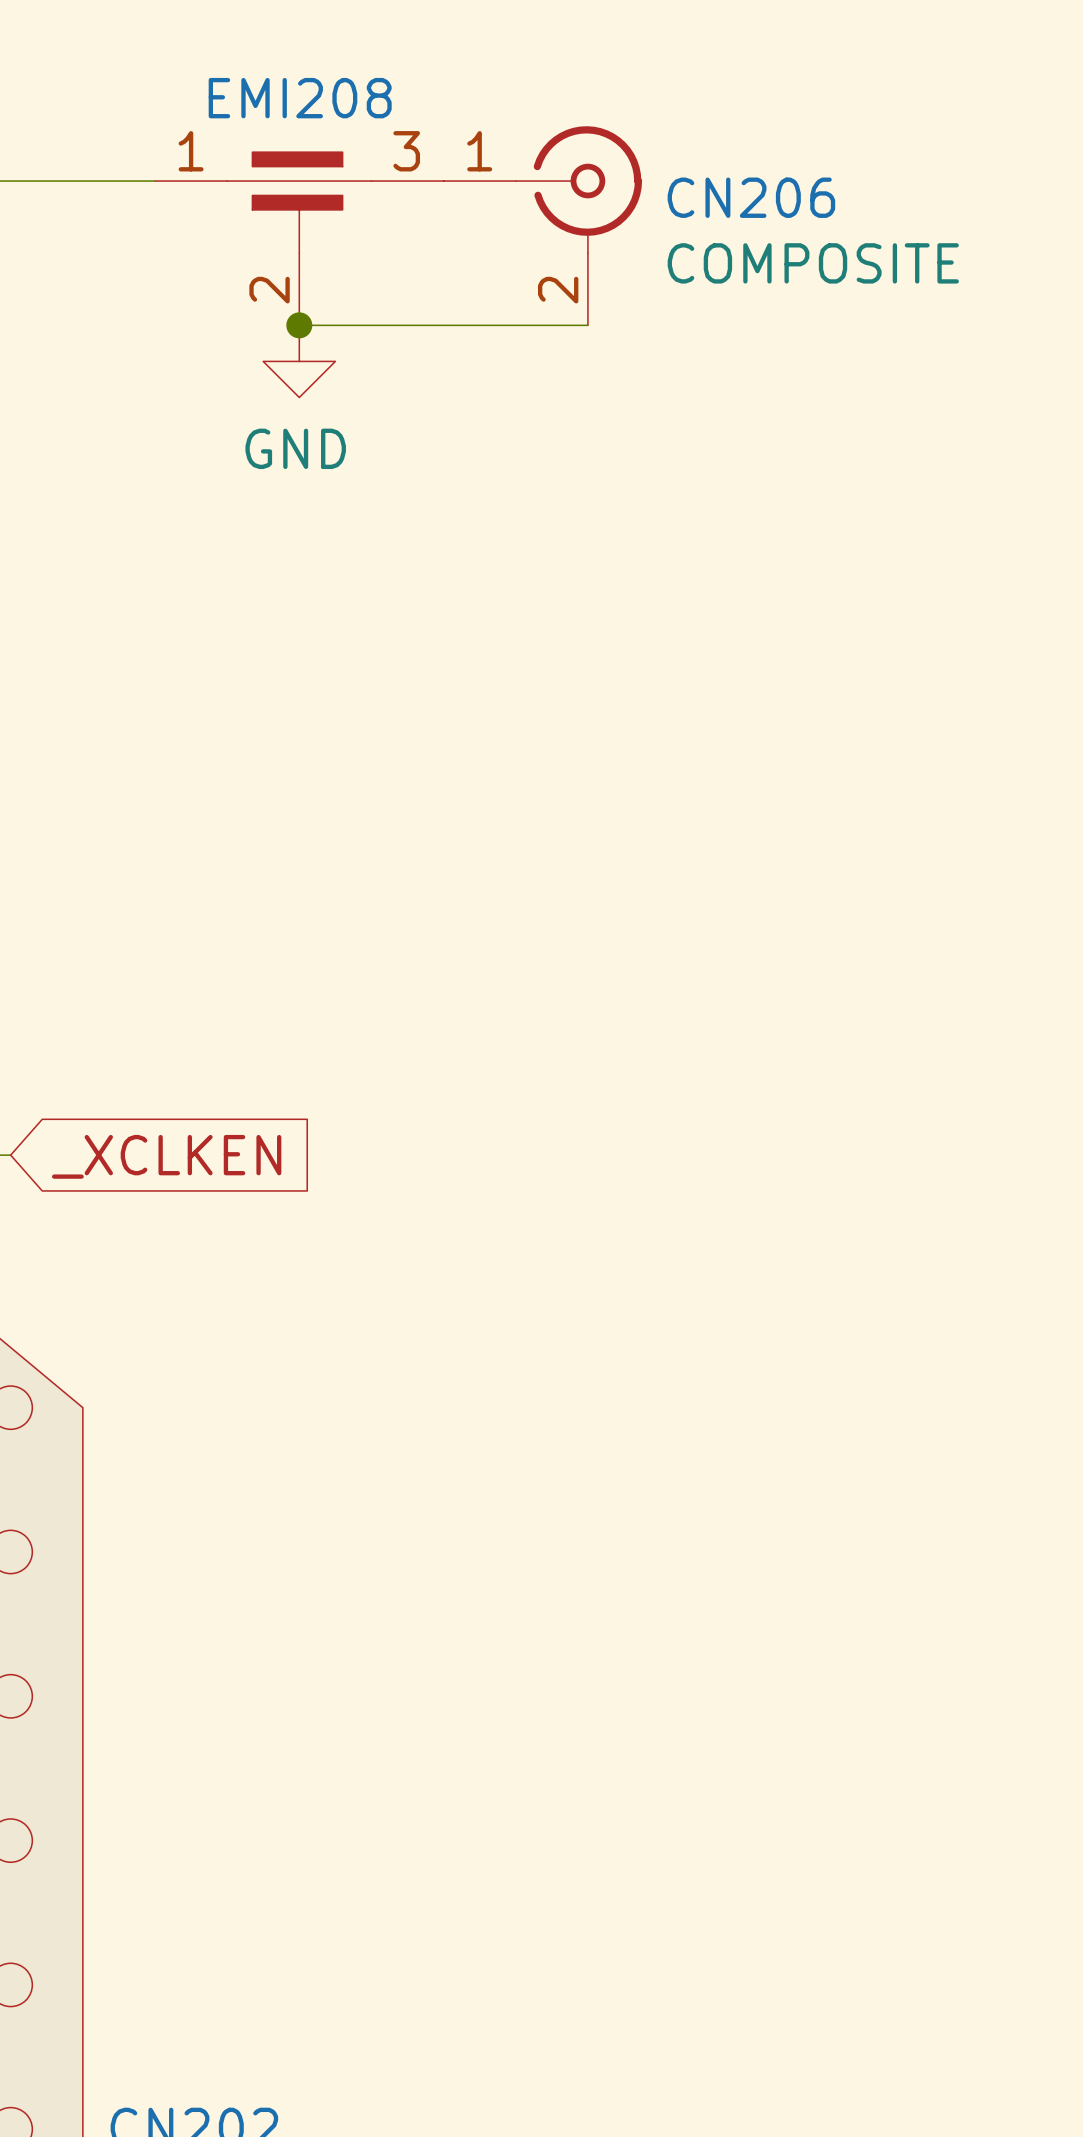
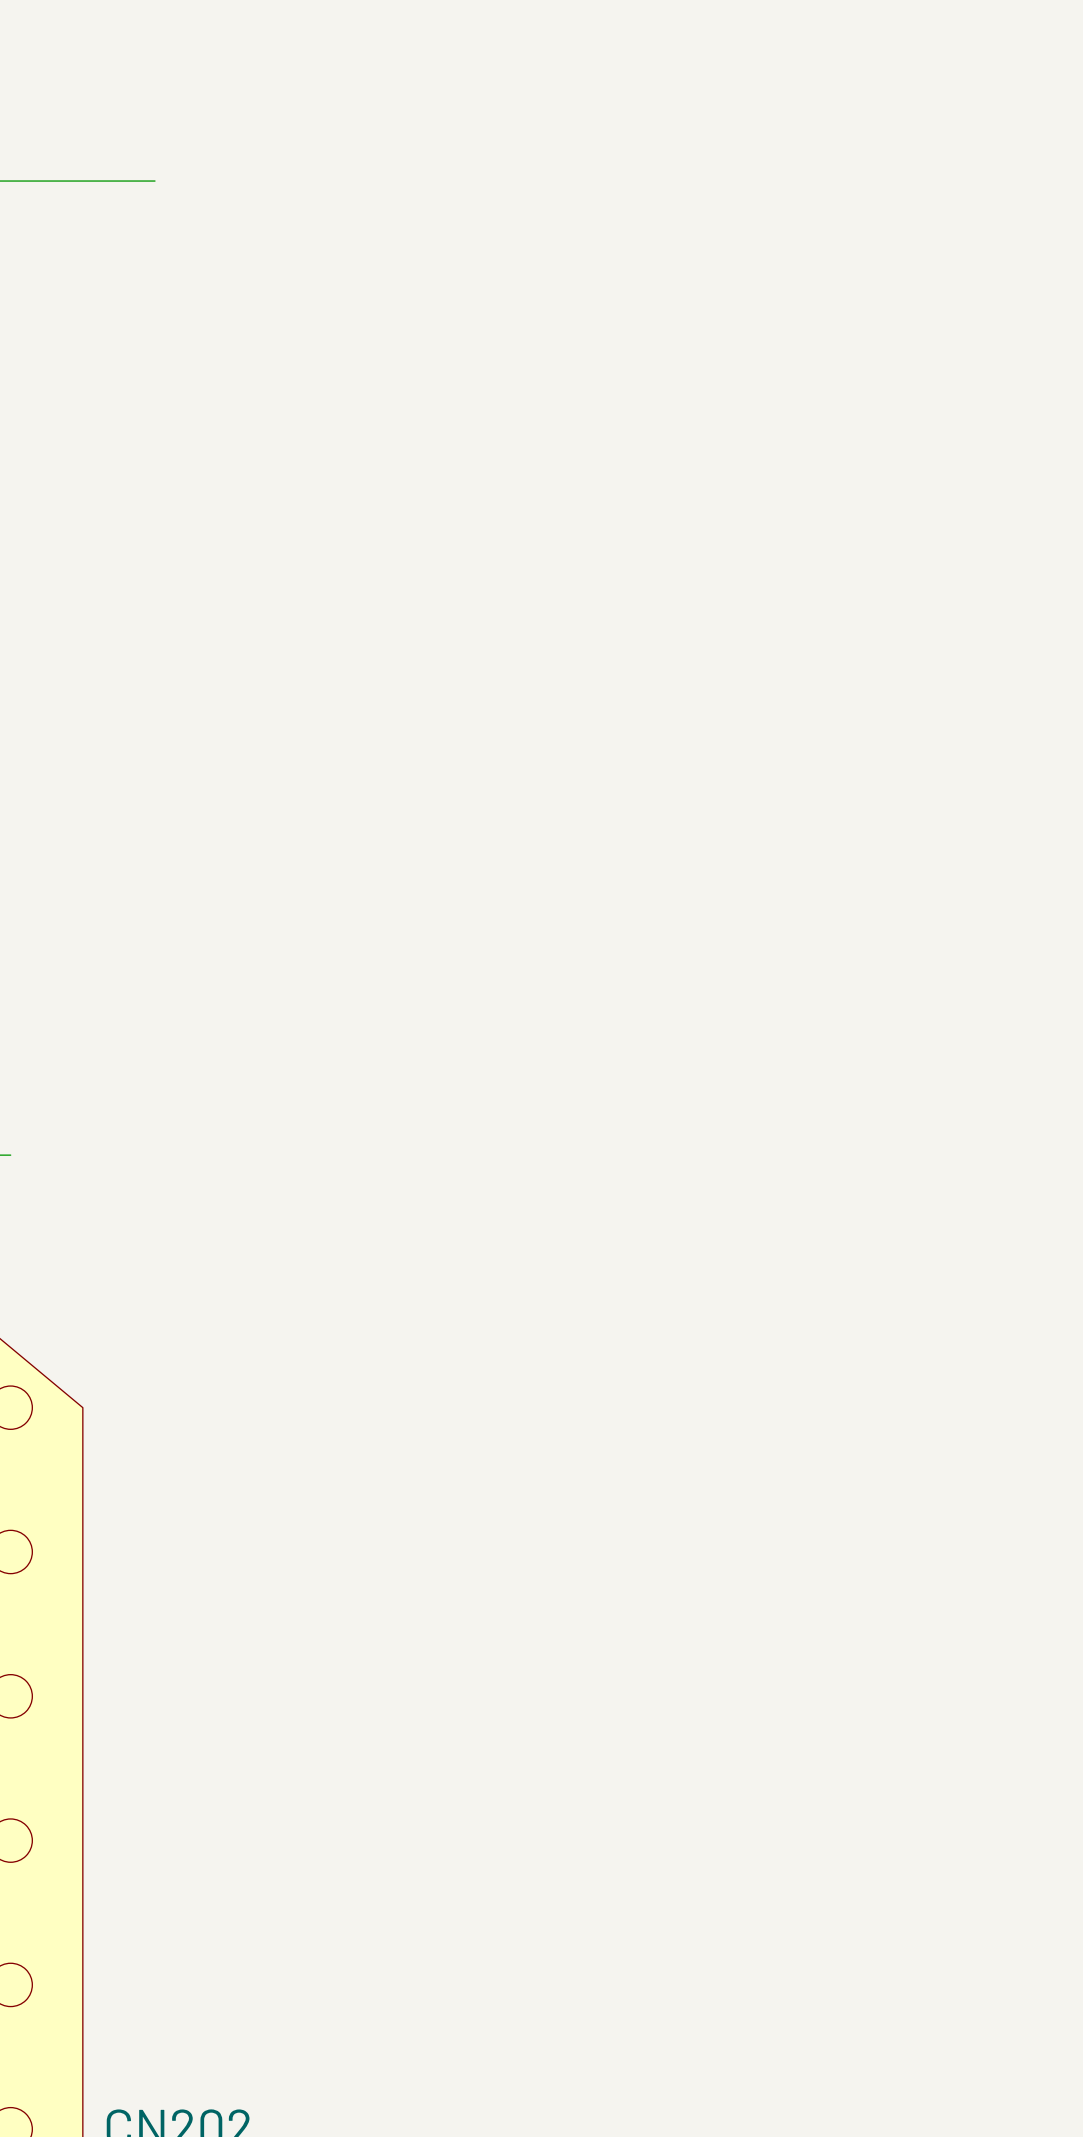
CN206: COMPOSITE (542, 225) -> none
EMI208: (299, 238) -> none
wire: (299, 325) (587, 325) -> none
junction: (299, 325) -> none
power symbol: GND (299, 361) -> none
global label: _XCLKEN (166, 1156) -> none

